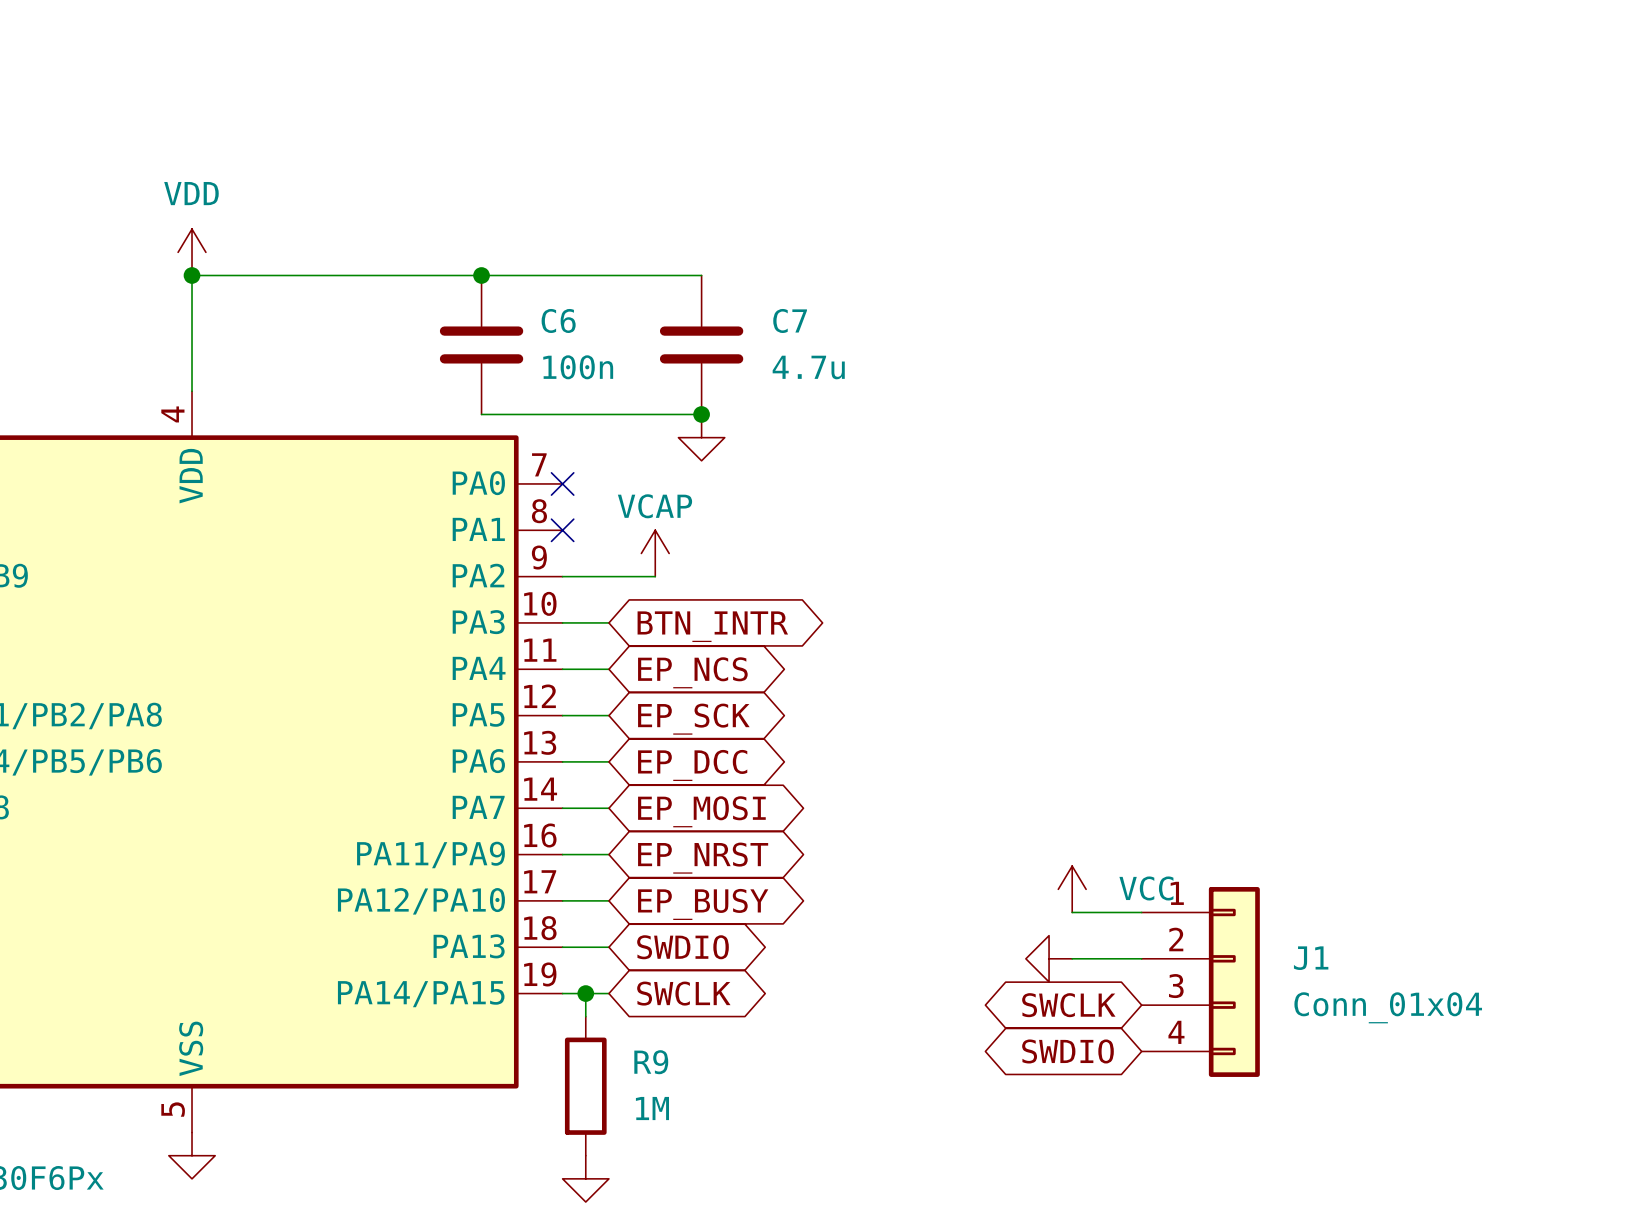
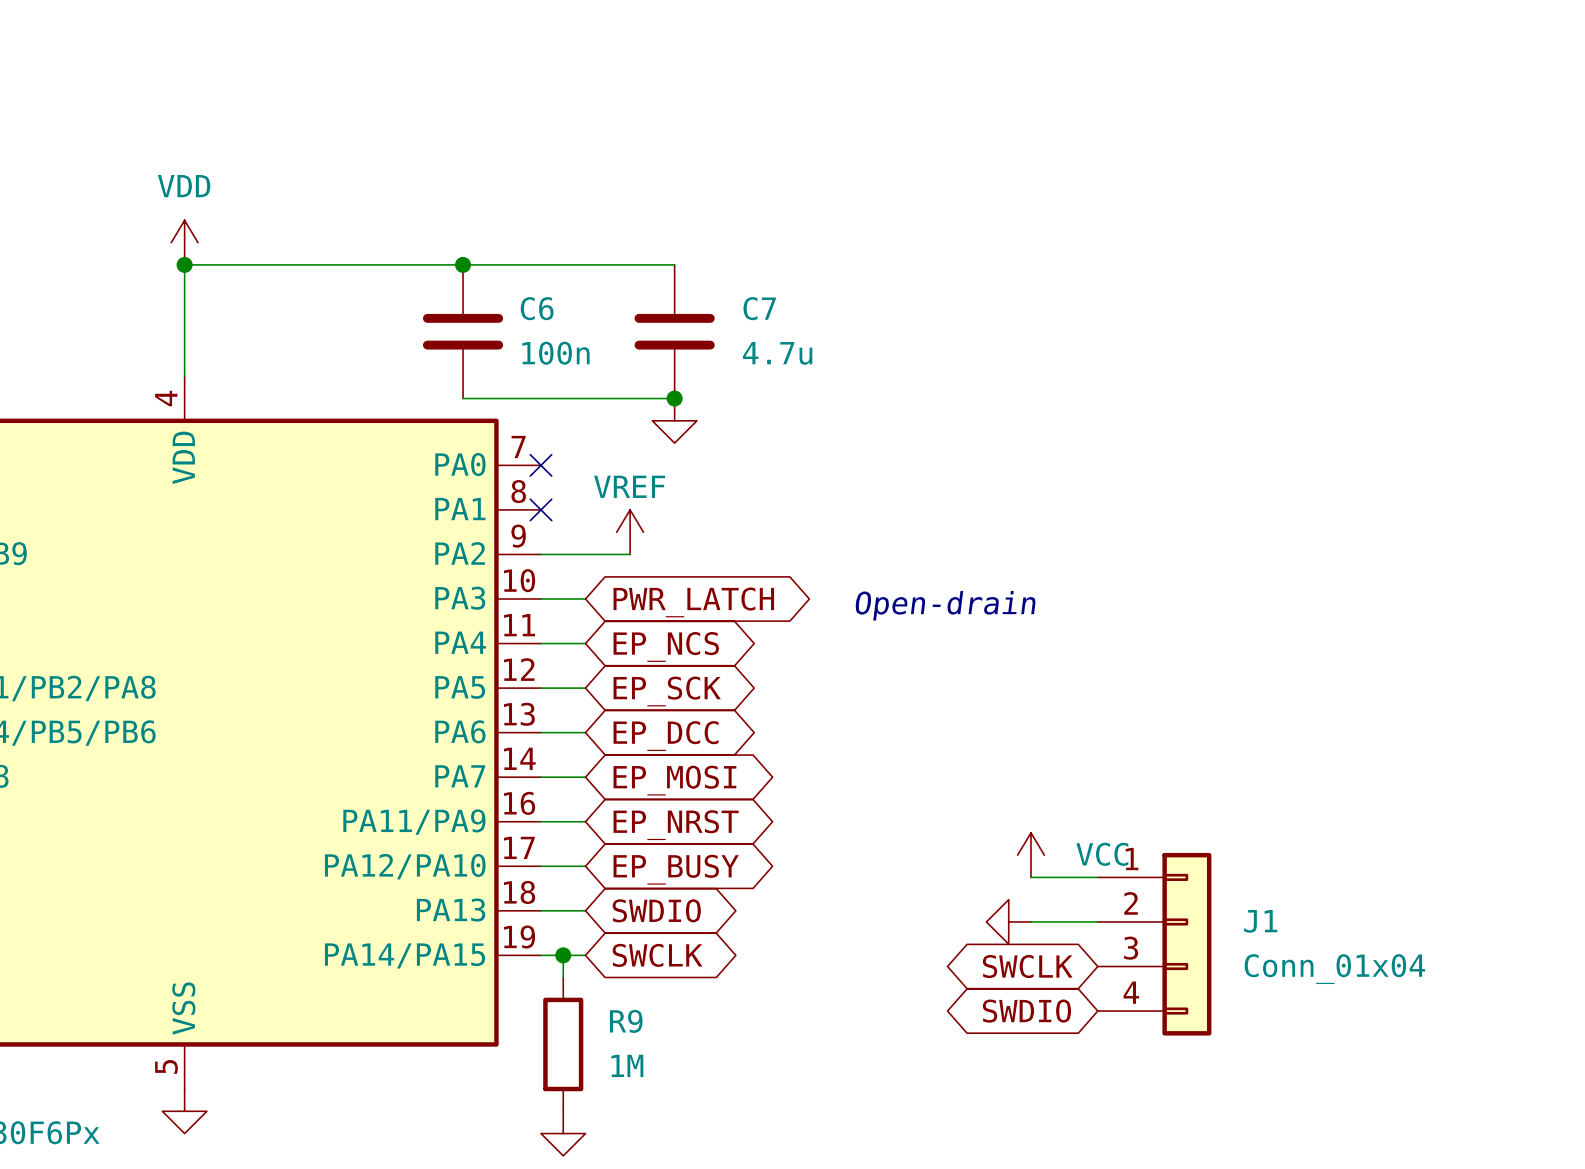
power symbol: VCAP (655, 553) -> VREF (630, 532)
global label: BTN_INTR (712, 626) -> PWR_LATCH (693, 602)
text: none -> Open-drain (945, 605)

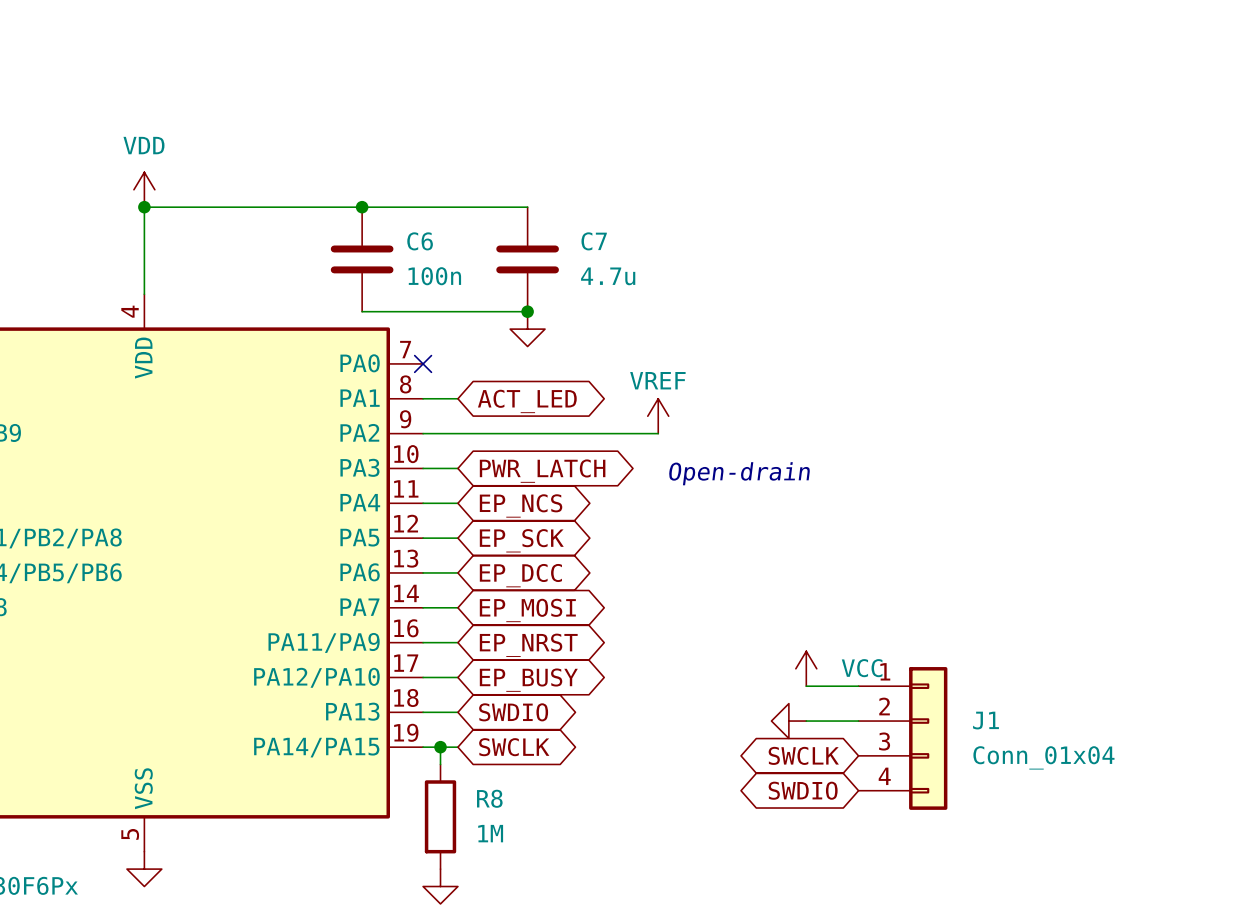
wire: none -> (423, 398) (457, 398)
no-connect mark: (540, 509) -> none
global label: none -> ACT_LED (527, 401)
power symbol position: VREF (630, 532) -> VREF (658, 416)
wire: none -> (492, 433) (658, 433)
R9 name: R9 (626, 1021) -> R8 (489, 798)

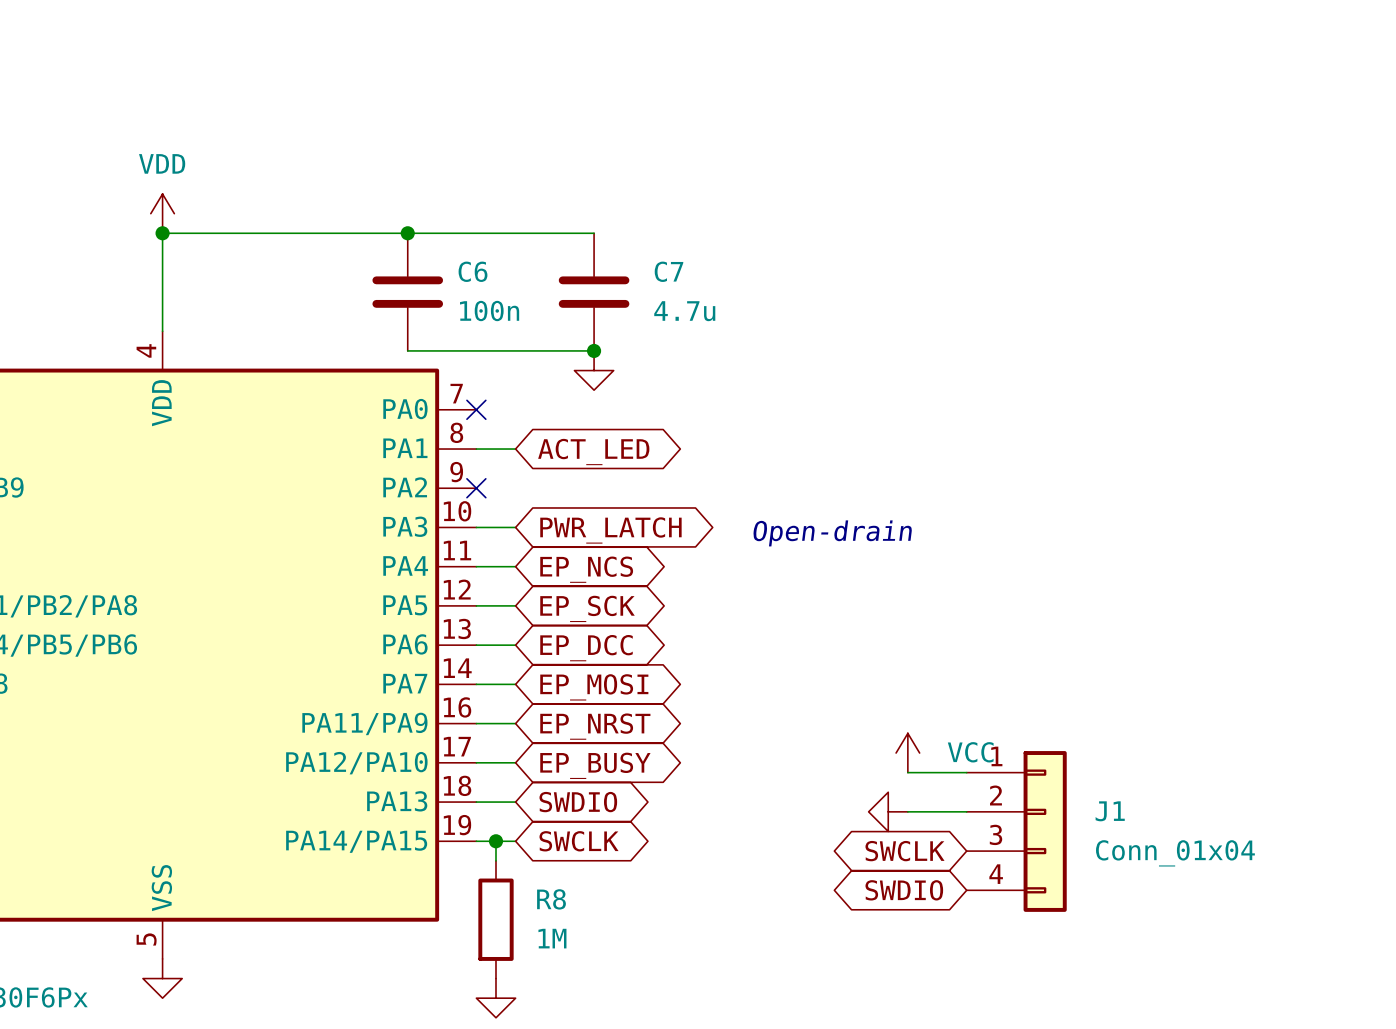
power symbol: VREF (658, 416) -> none
wire: (423, 433) (658, 433) -> none
no-connect mark: none -> (476, 488)

